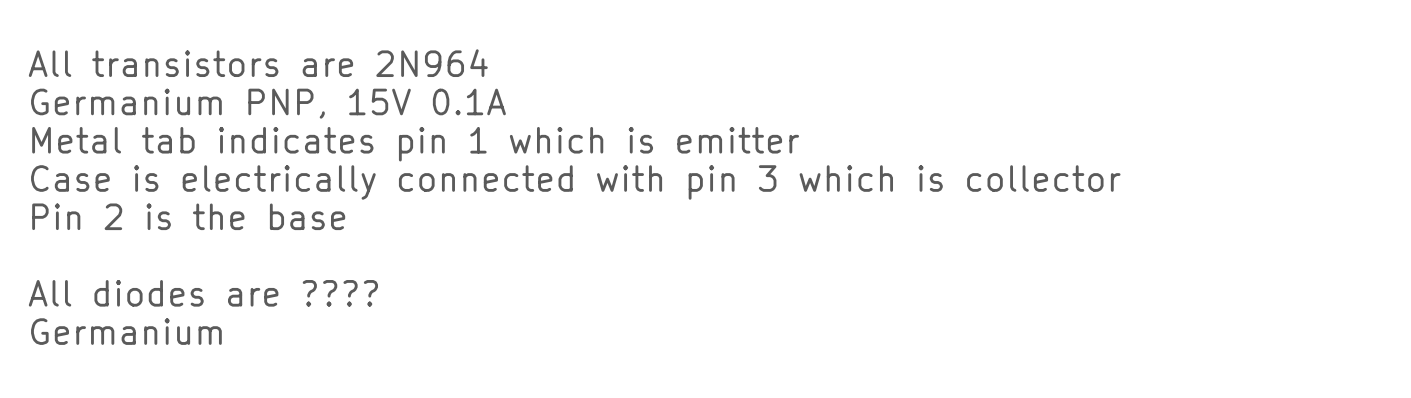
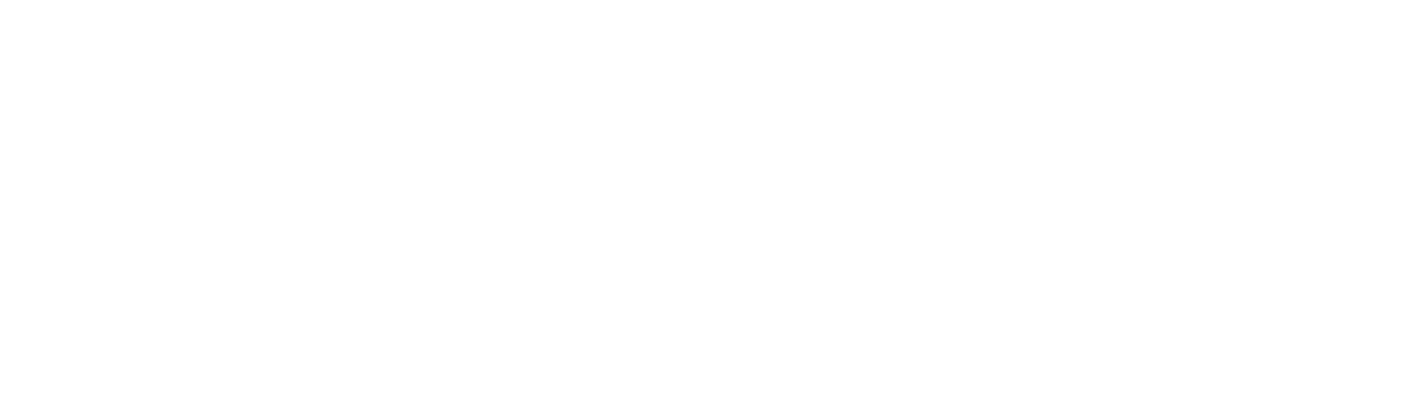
text: All transistors are 2N964 (258, 63) -> none
text: Germanium PNP, 15V 0.1A (268, 103) -> none
text: Metal tab indicates pin 1 which is emitter (415, 144) -> none
text: Case is electrically connected with pin 3 which is collector (575, 182) -> none
text: Pin 2 is the base (188, 216) -> none
text: All diodes are ???? (203, 293) -> none
text: Germanium (126, 331) -> none

